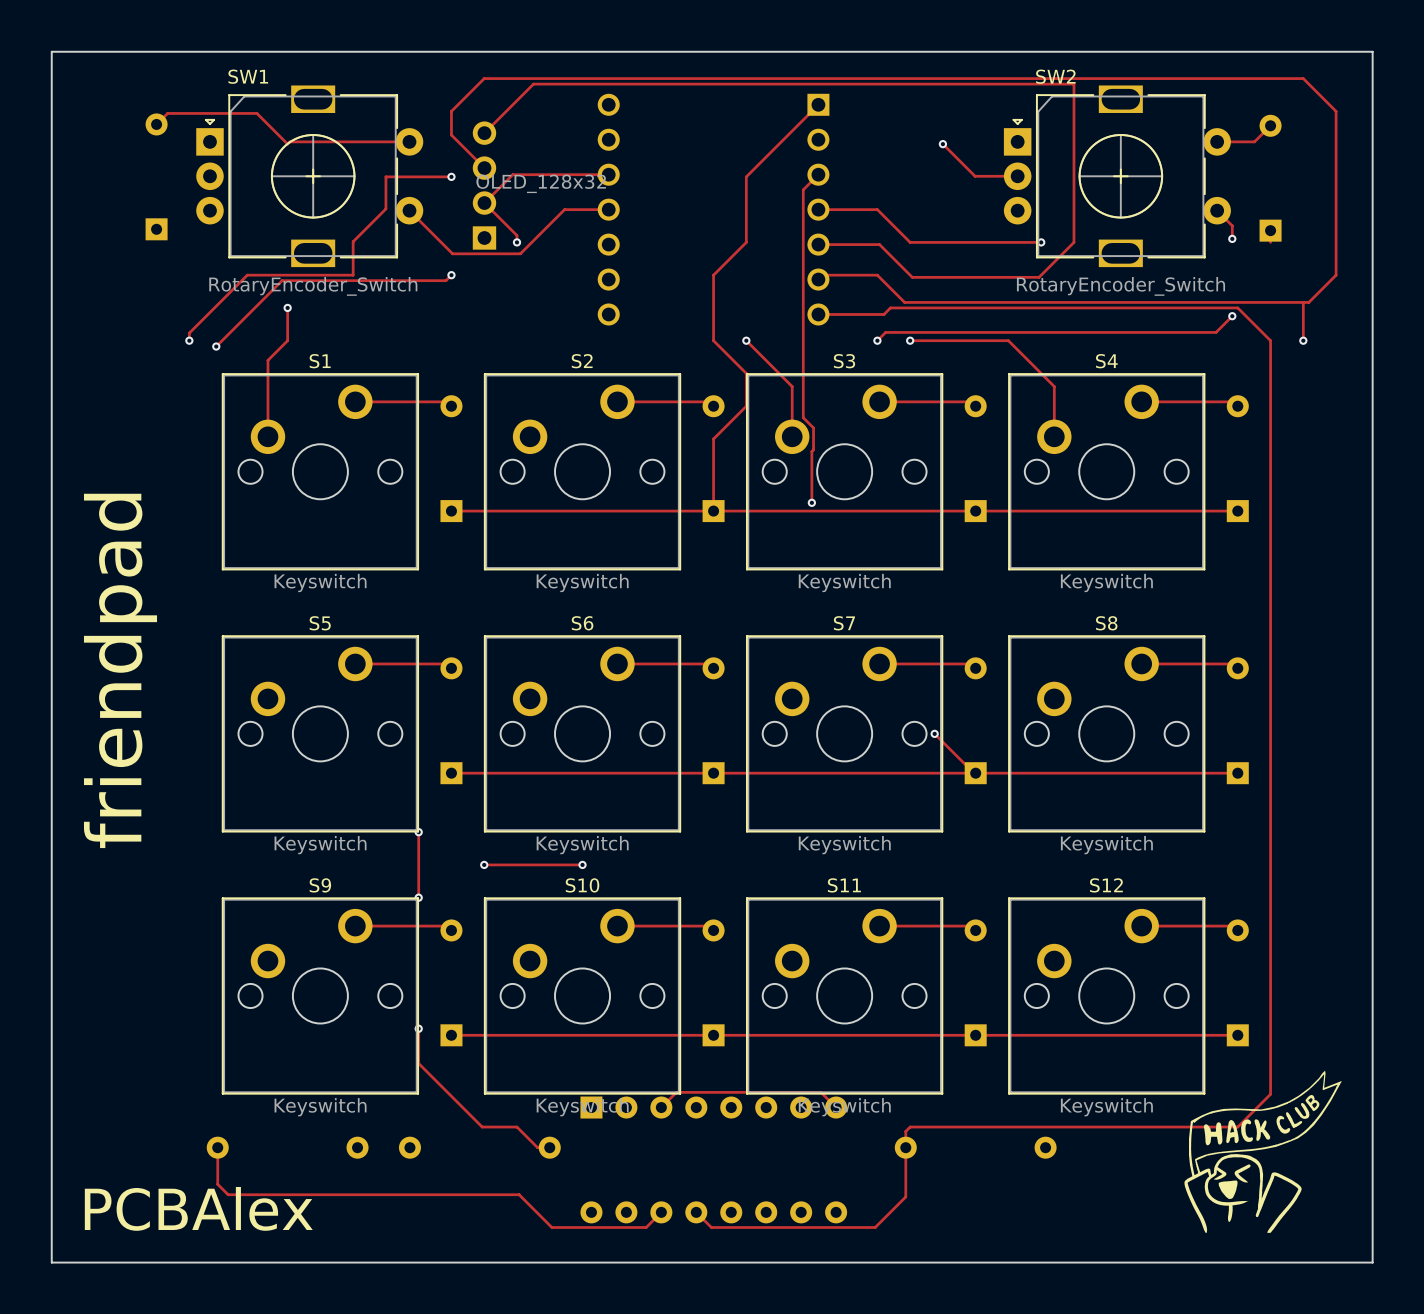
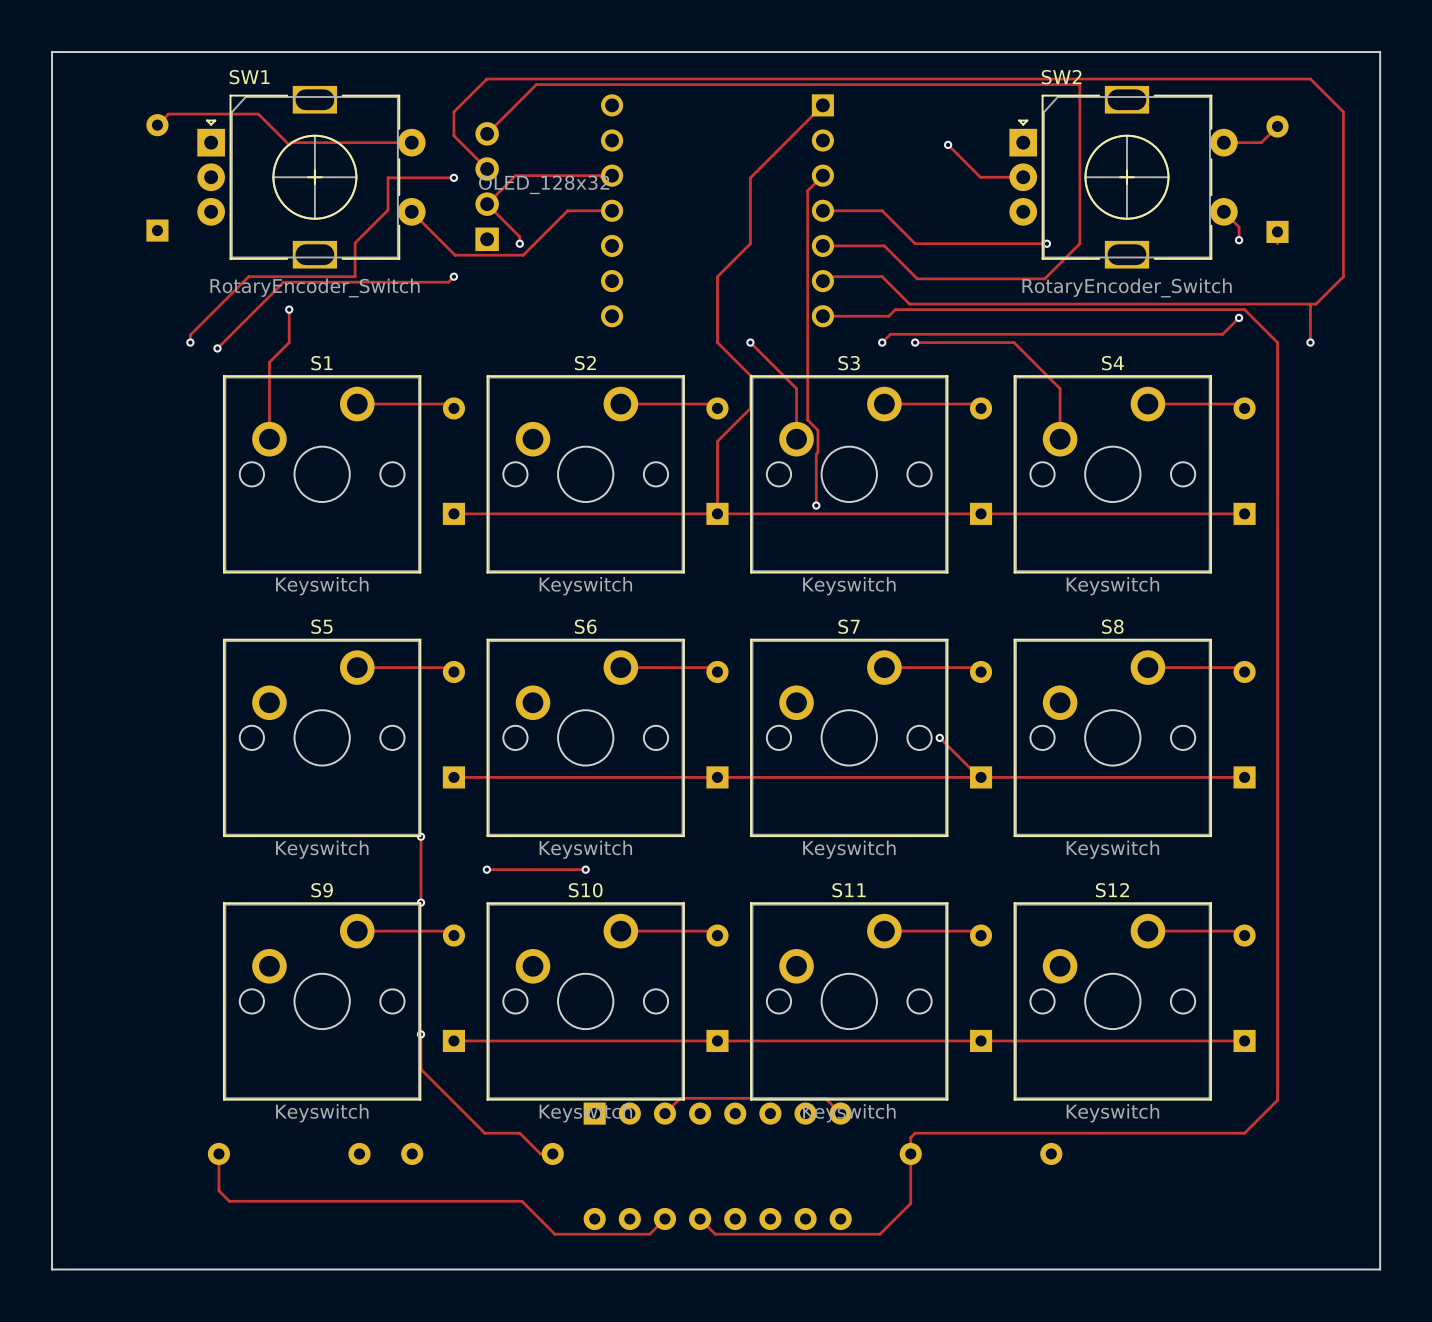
text: friendpad (120, 670) -> none
drawing: [1184, 1070, 1342, 1233] -> none
text: PCBAlex (198, 1208) -> none

